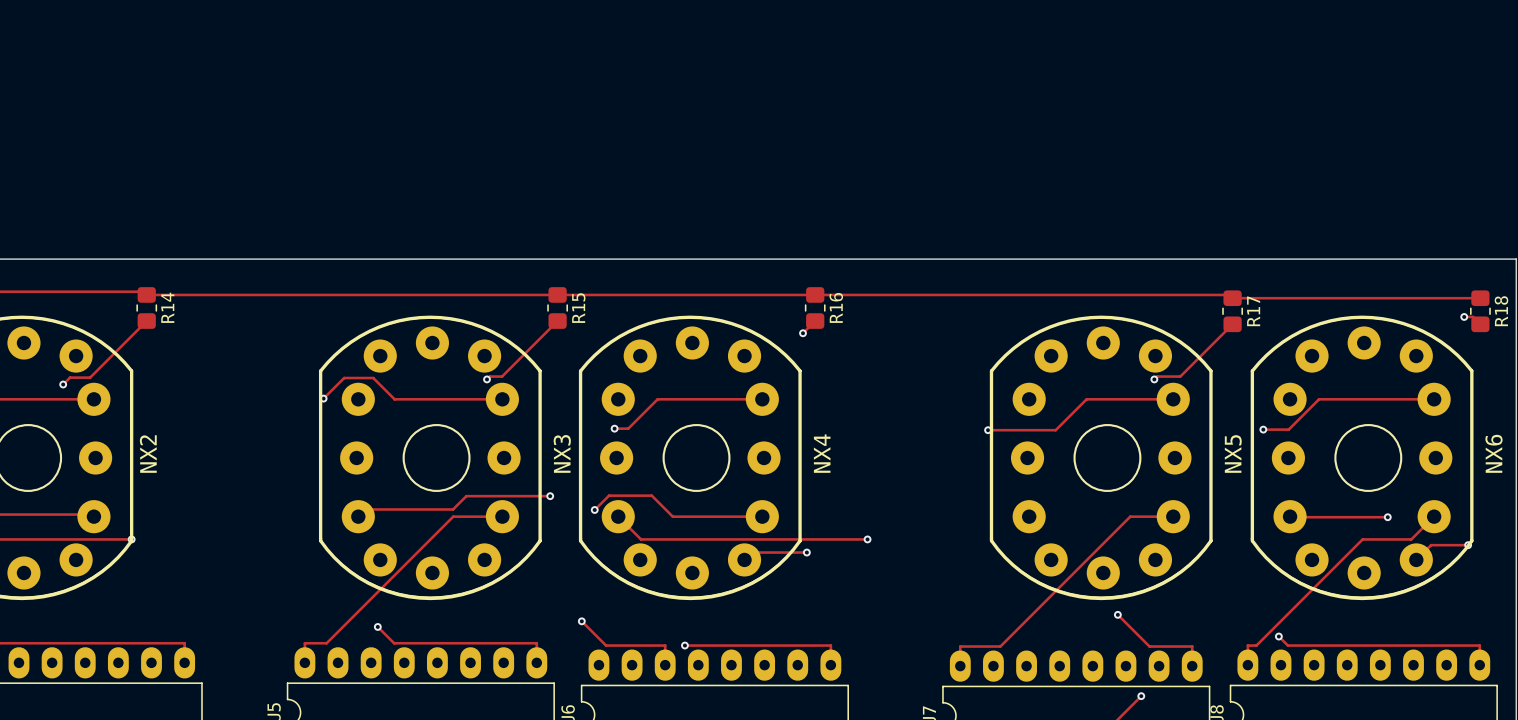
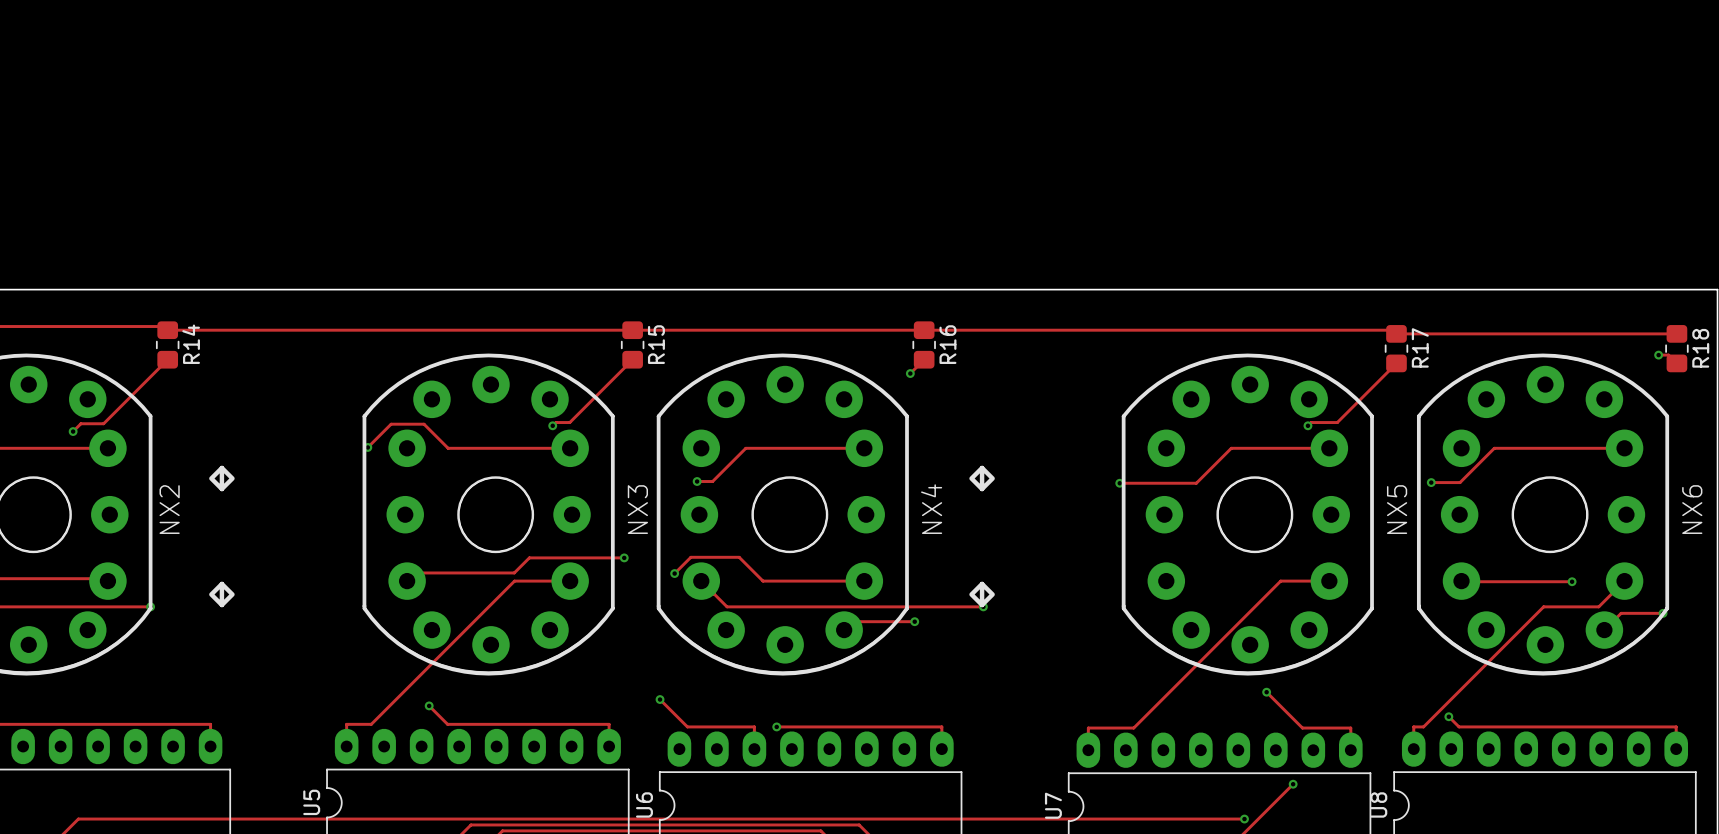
text: none -> : (221, 536)
text: none -> : (982, 536)

